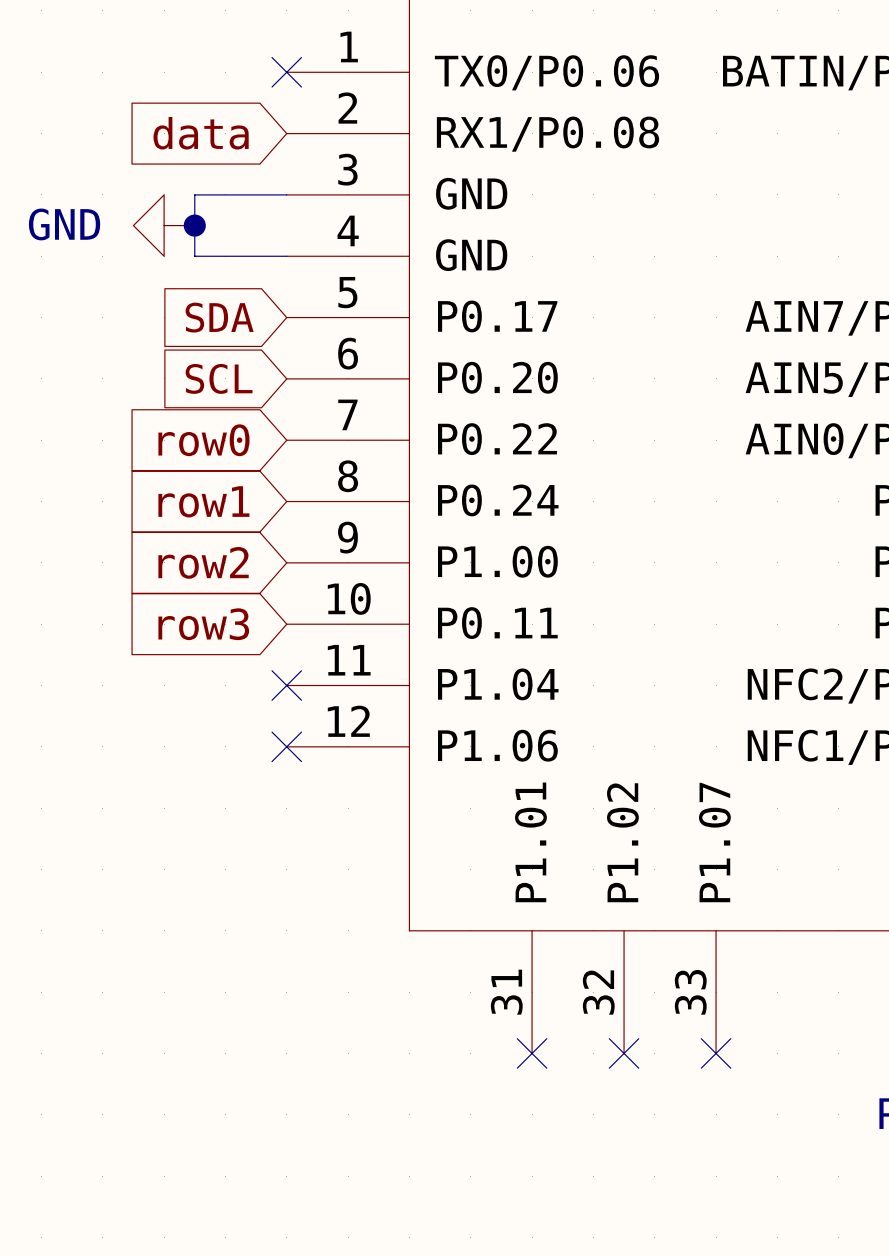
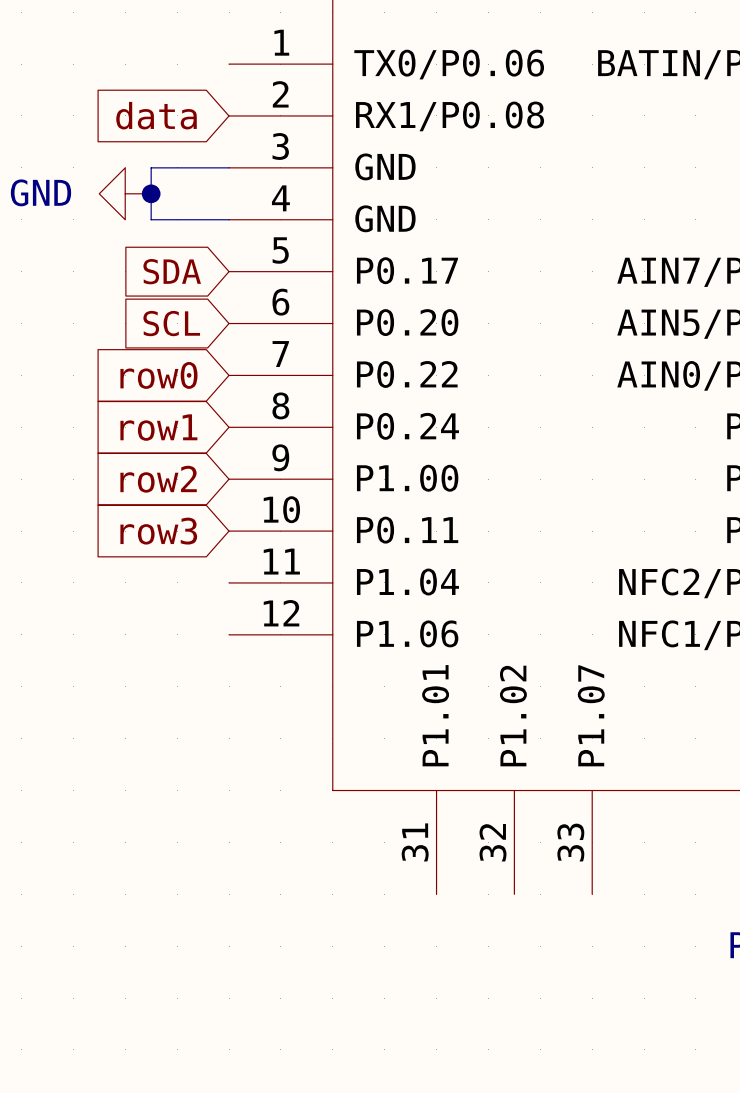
no-connect mark: (286, 72) -> none
no-connect mark: (286, 685) -> none
no-connect mark: (286, 746) -> none
no-connect mark: (532, 1053) -> none
no-connect mark: (624, 1053) -> none
no-connect mark: (716, 1053) -> none

